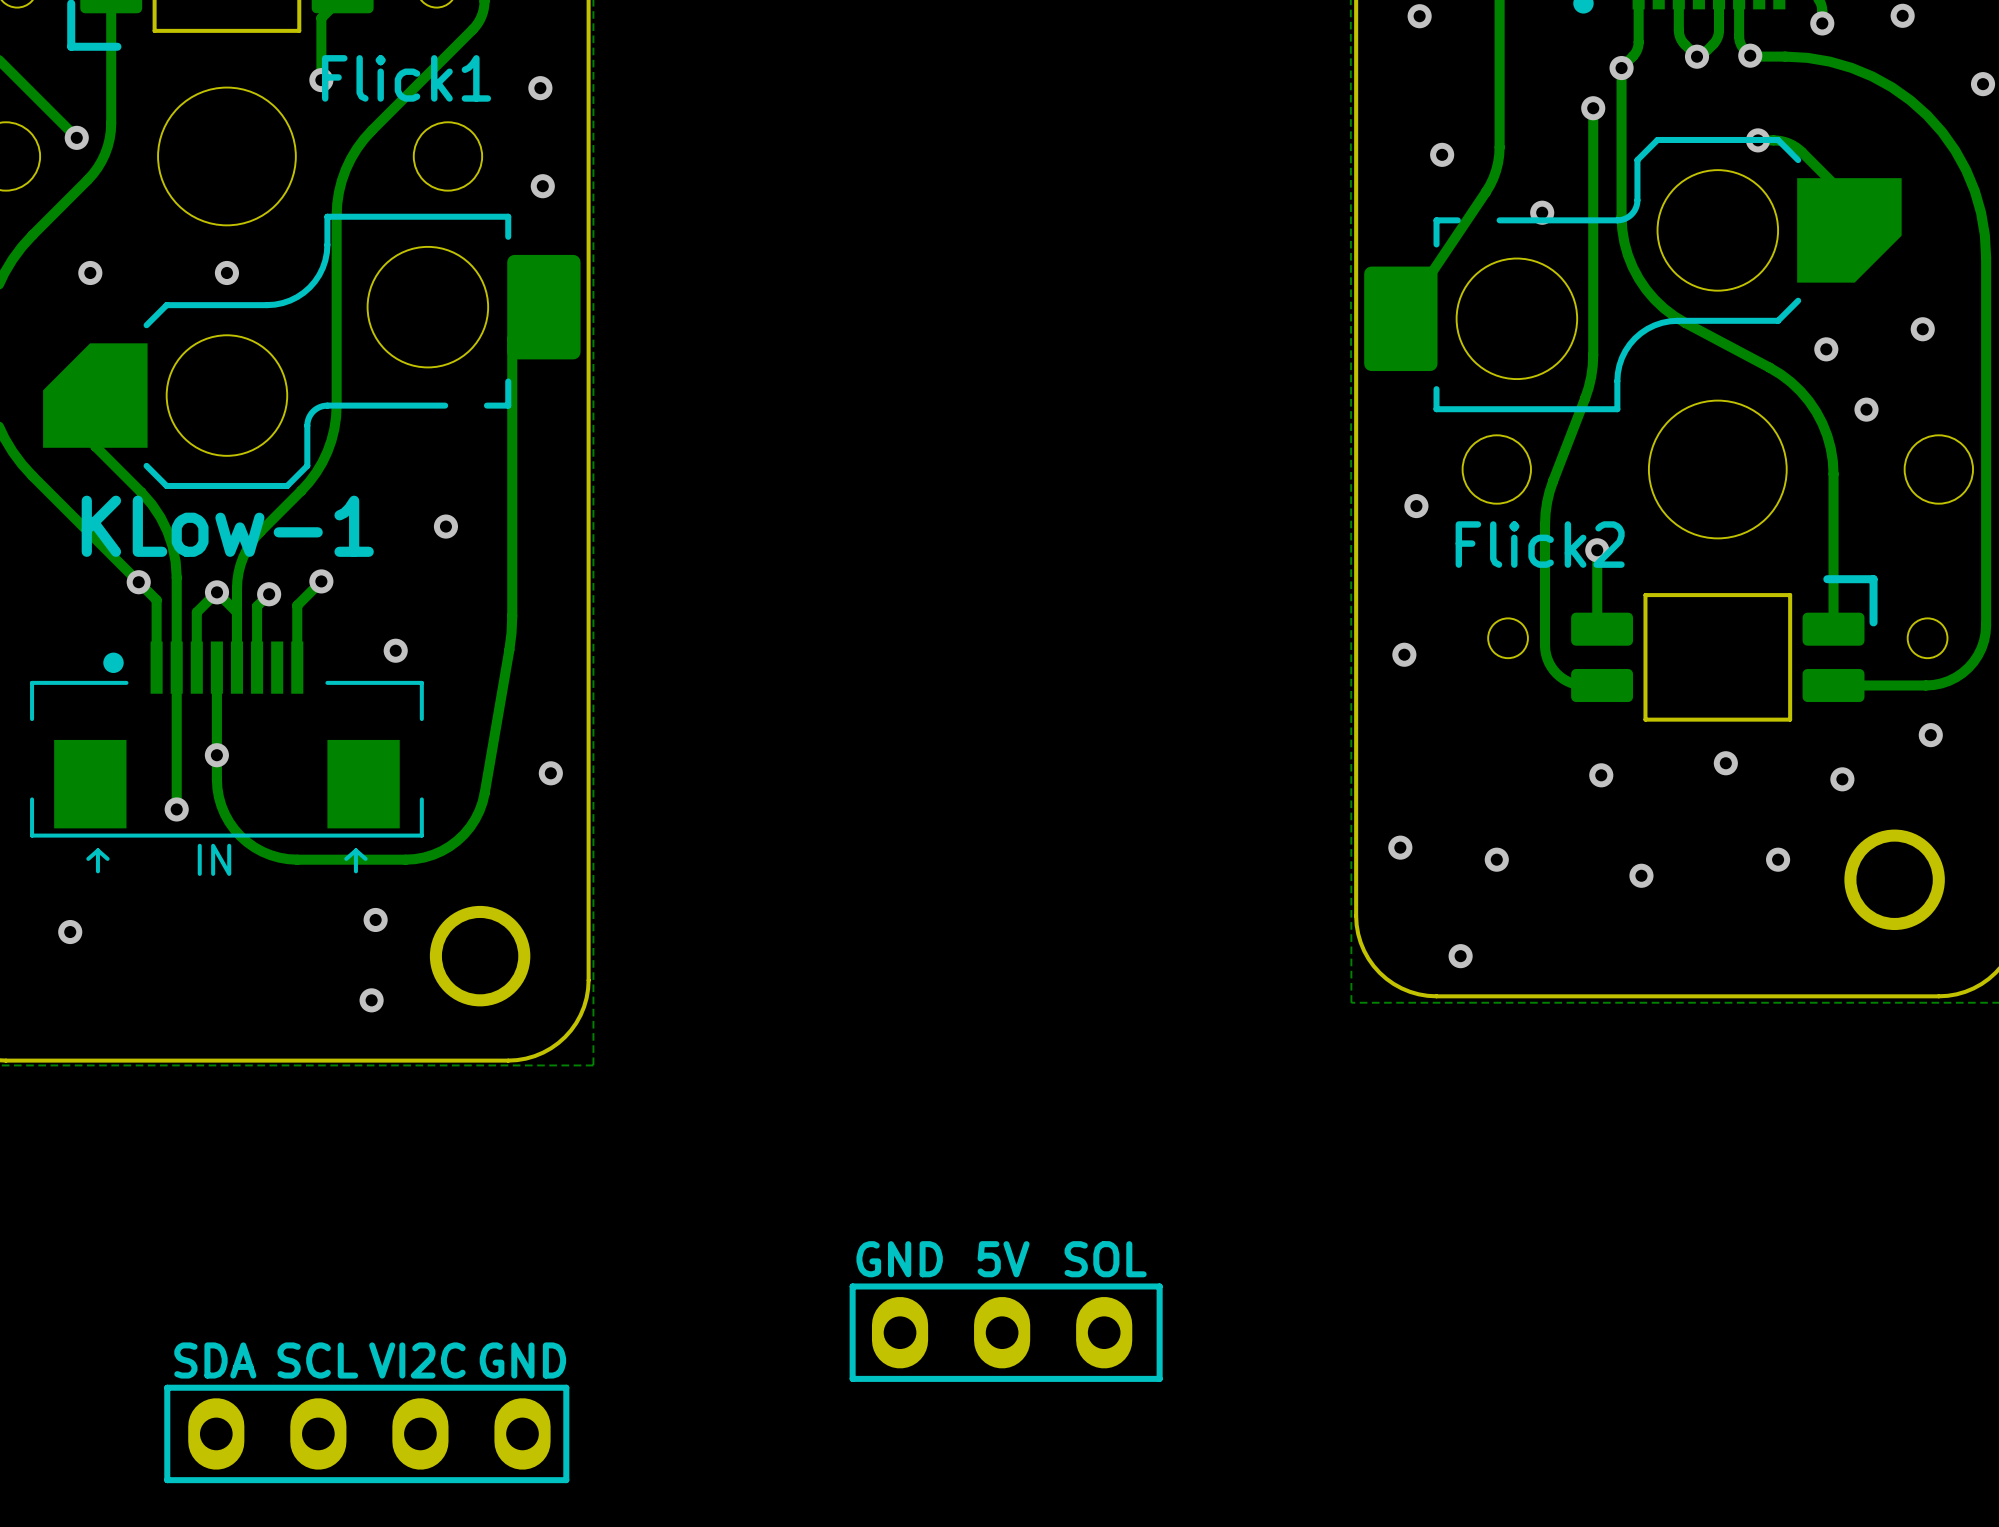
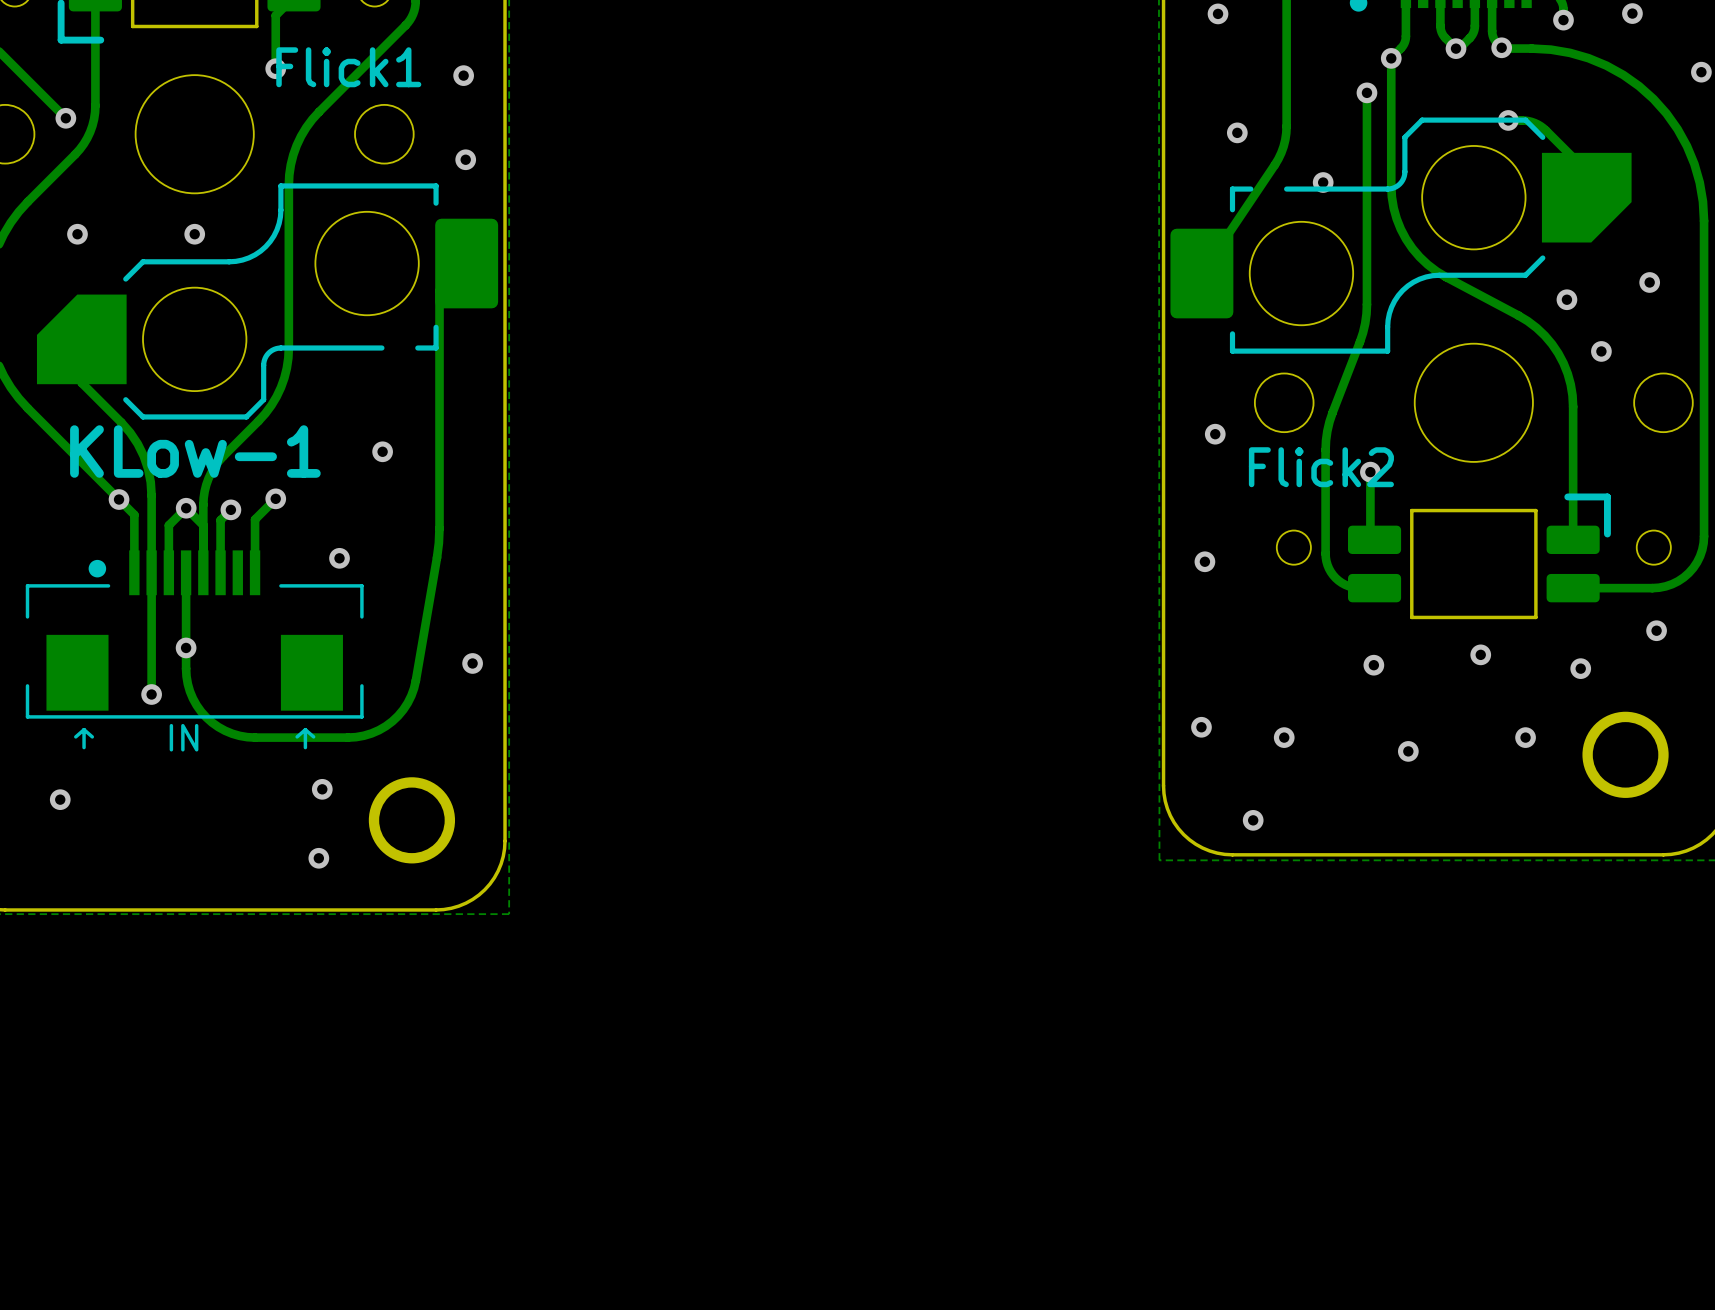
part: (1006, 1332) -> none
part: (366, 1433) -> none

